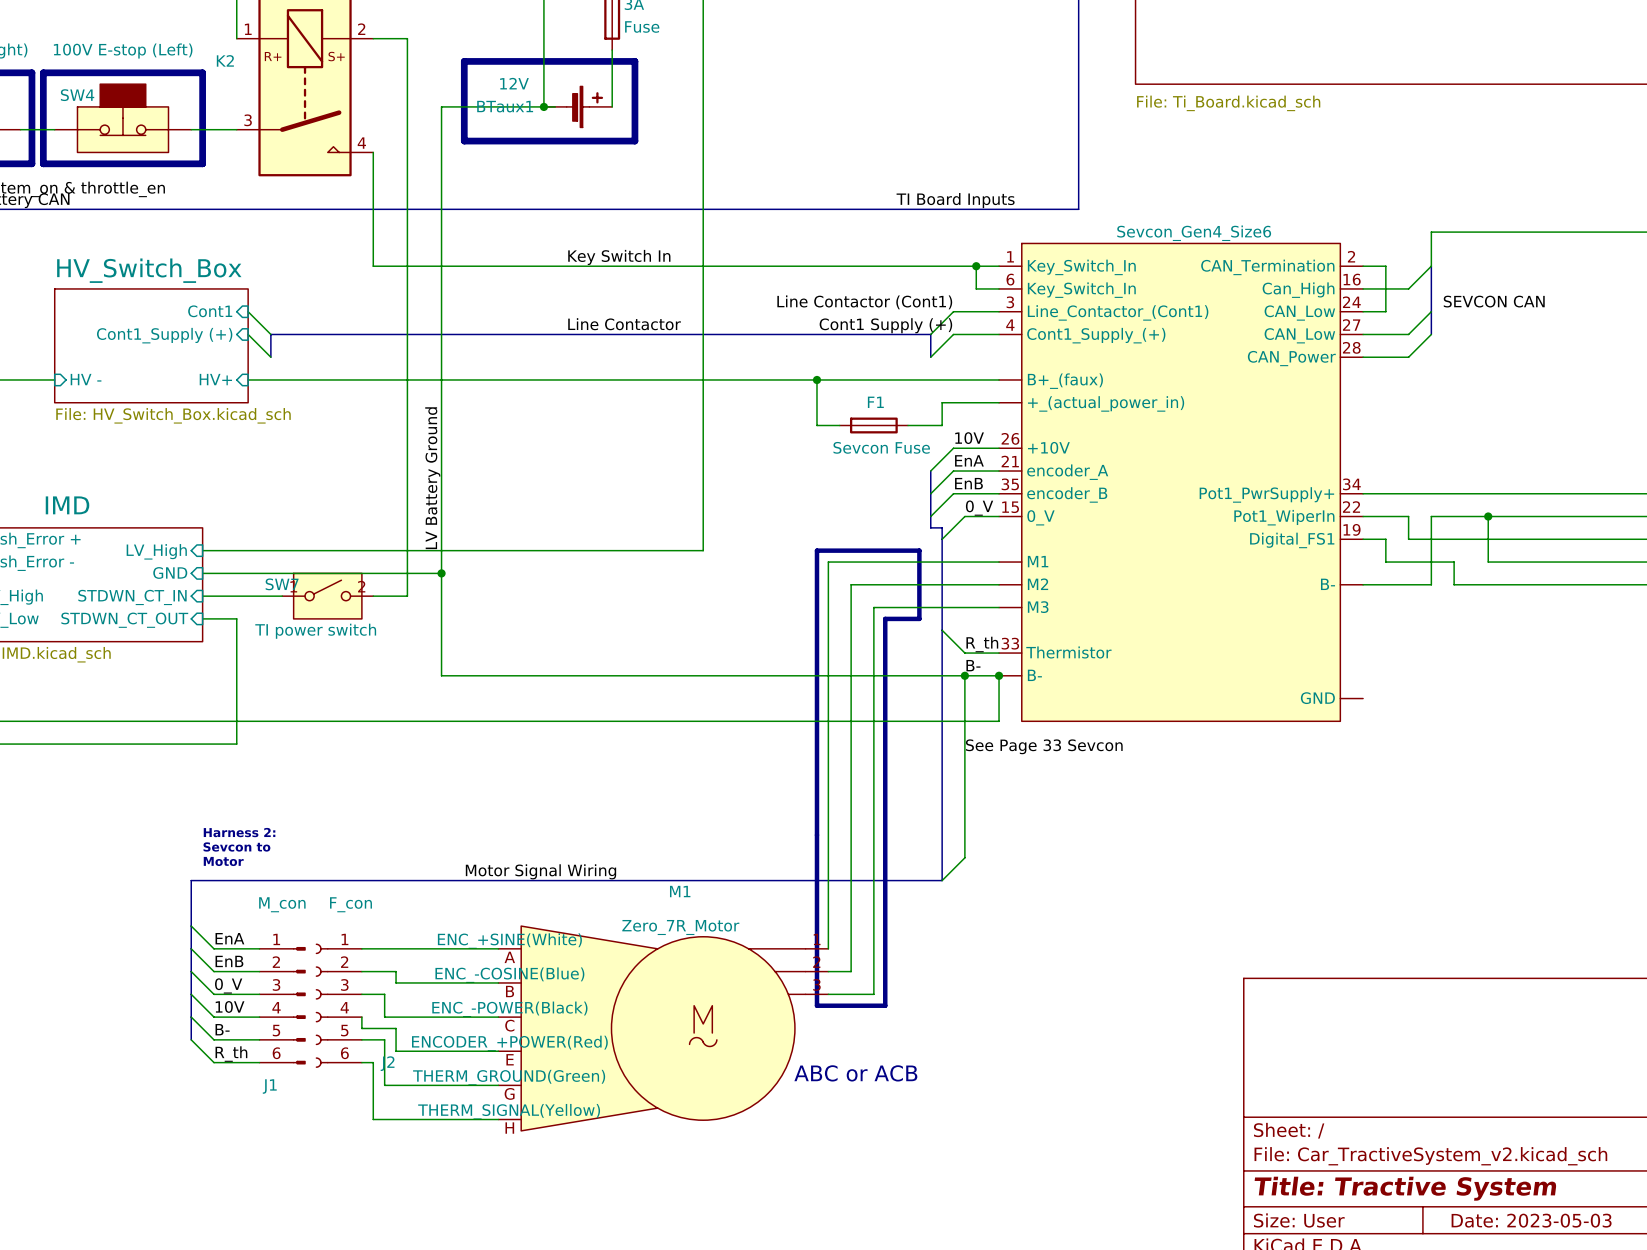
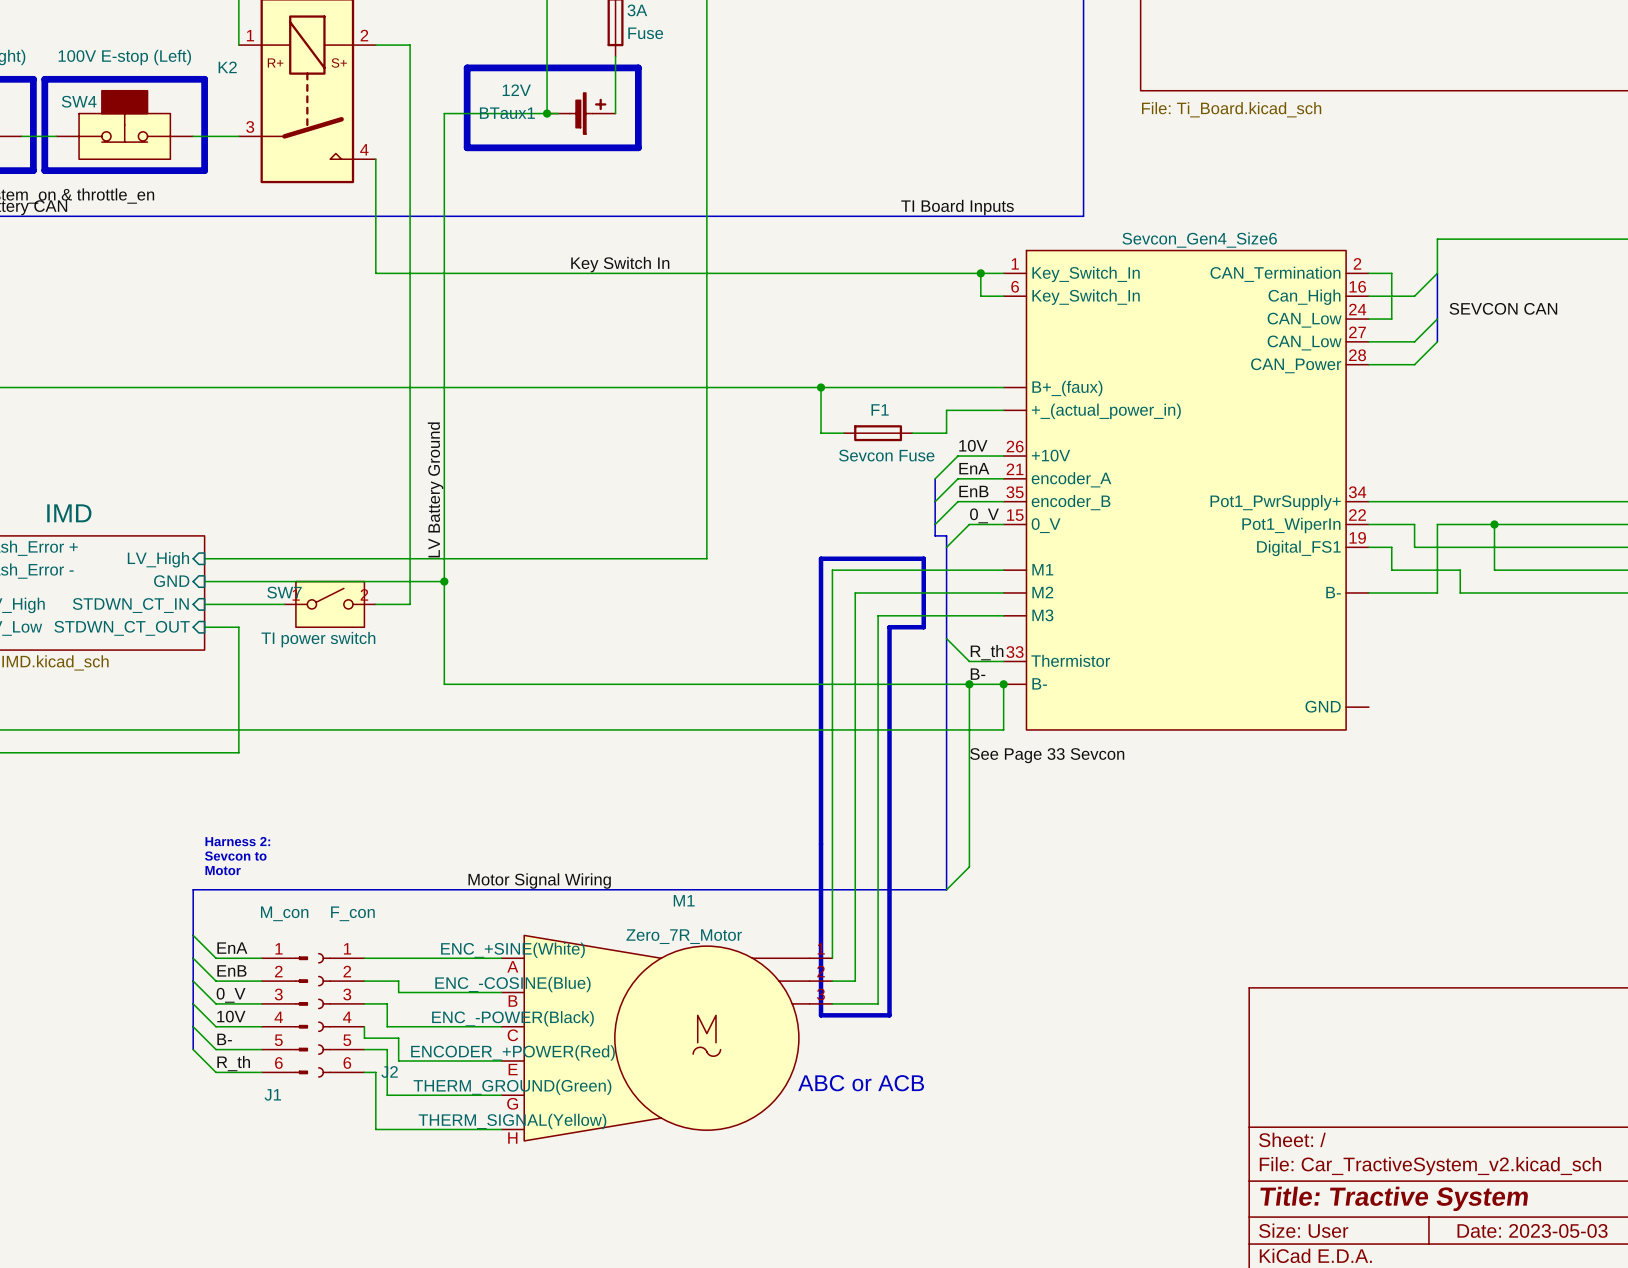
part symbol: [999, 243, 1364, 722] -> [1003, 250, 1369, 730]
label: Line Contactor (Cont1) (864, 302) -> none
sheet pin: Cont1 (210, 311) -> none
wire: (248, 311) (270, 334) -> none
wire: (999, 311) (953, 311) (930, 334) -> none
label: Line Contactor (624, 324) -> none
label: Cont1 Supply (+) (885, 325) -> none
wire: (248, 334) (270, 357) -> none
wire: (999, 334) (953, 334) (930, 357) -> none
sheet pin: Cont1_Supply (+) (164, 335) -> none
sheet HV_Switch_Box: File: HV_Switch_Box.kicad_sch (151, 345) -> none
bus: (270, 357) (270, 334) (930, 334) (930, 357) -> none
wire: none -> (56, 387) (250, 387)
sheet pin: HV - (86, 379) -> none
sheet pin: HV+ (215, 379) -> none

